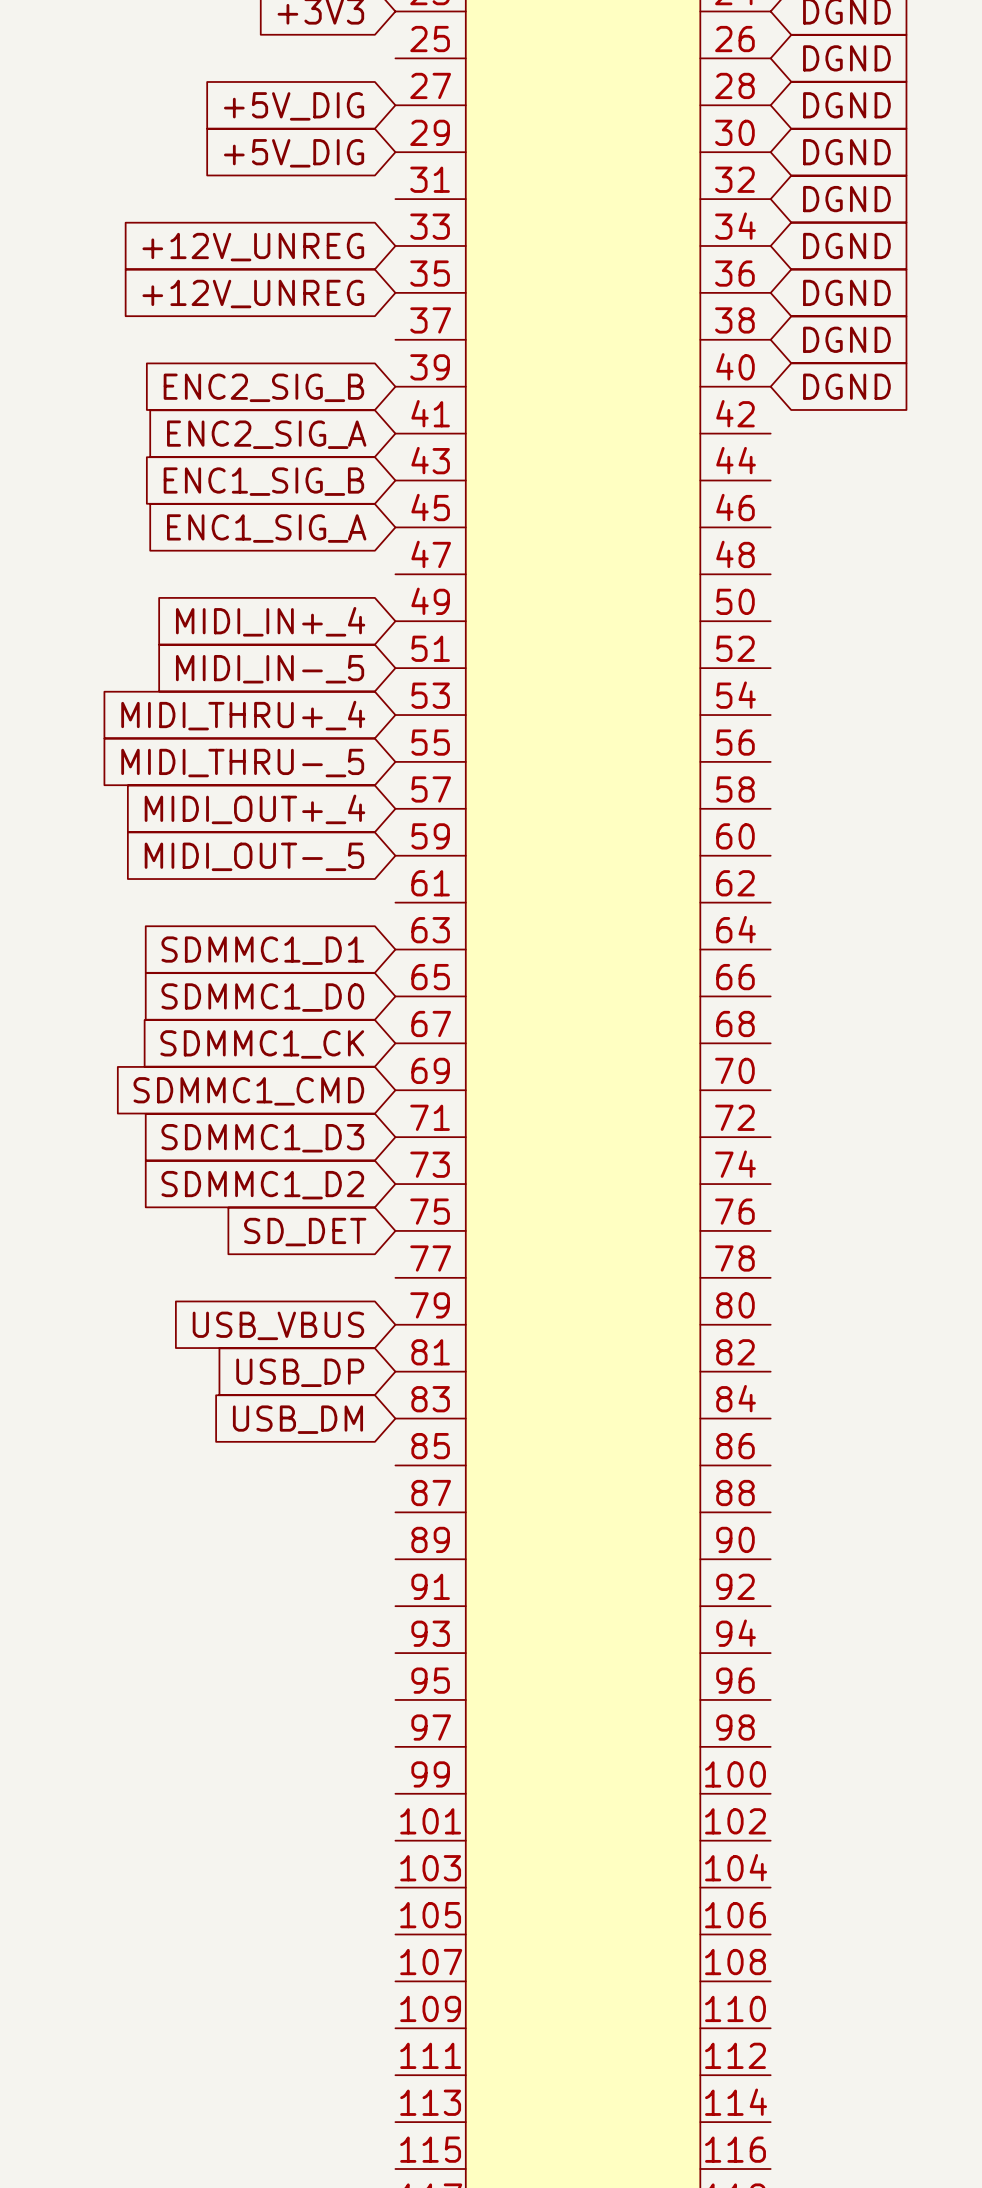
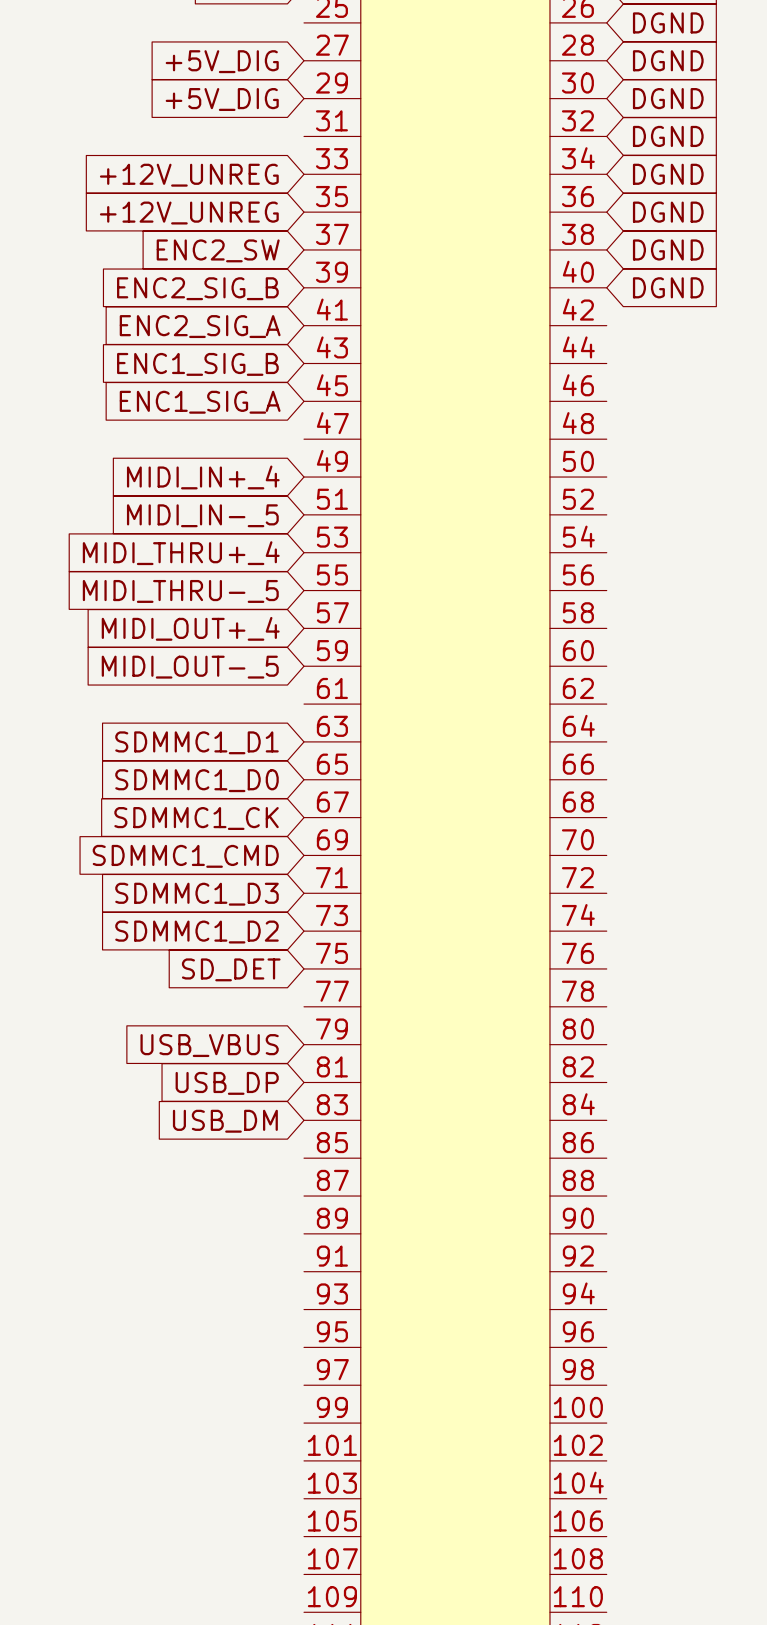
global label: none -> ENC2_SW (218, 250)

